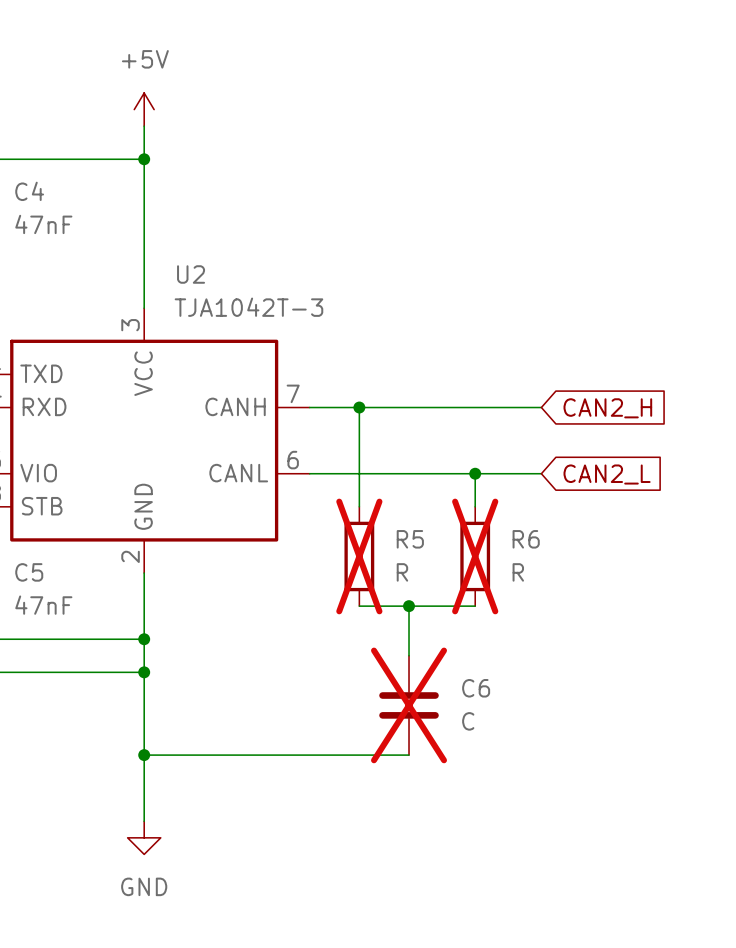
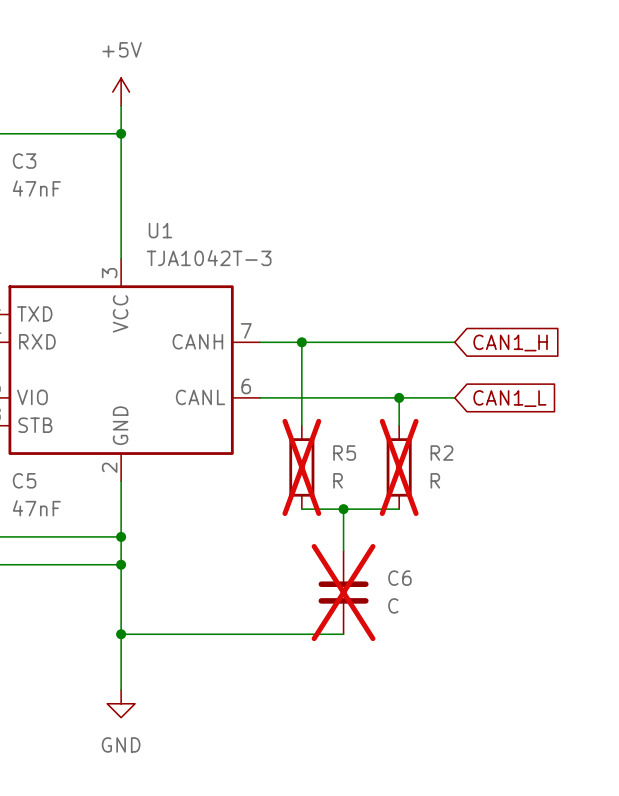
C4 name: C4 (29, 191) -> C3 (24, 161)
U2 name: U2 (191, 274) -> U1 (160, 230)
global label: CAN2_H (607, 408) -> CAN1_H (510, 342)
global label: CAN2_L (607, 474) -> CAN1_L (509, 398)
R6 name: R6 (526, 539) -> R2 (441, 453)

